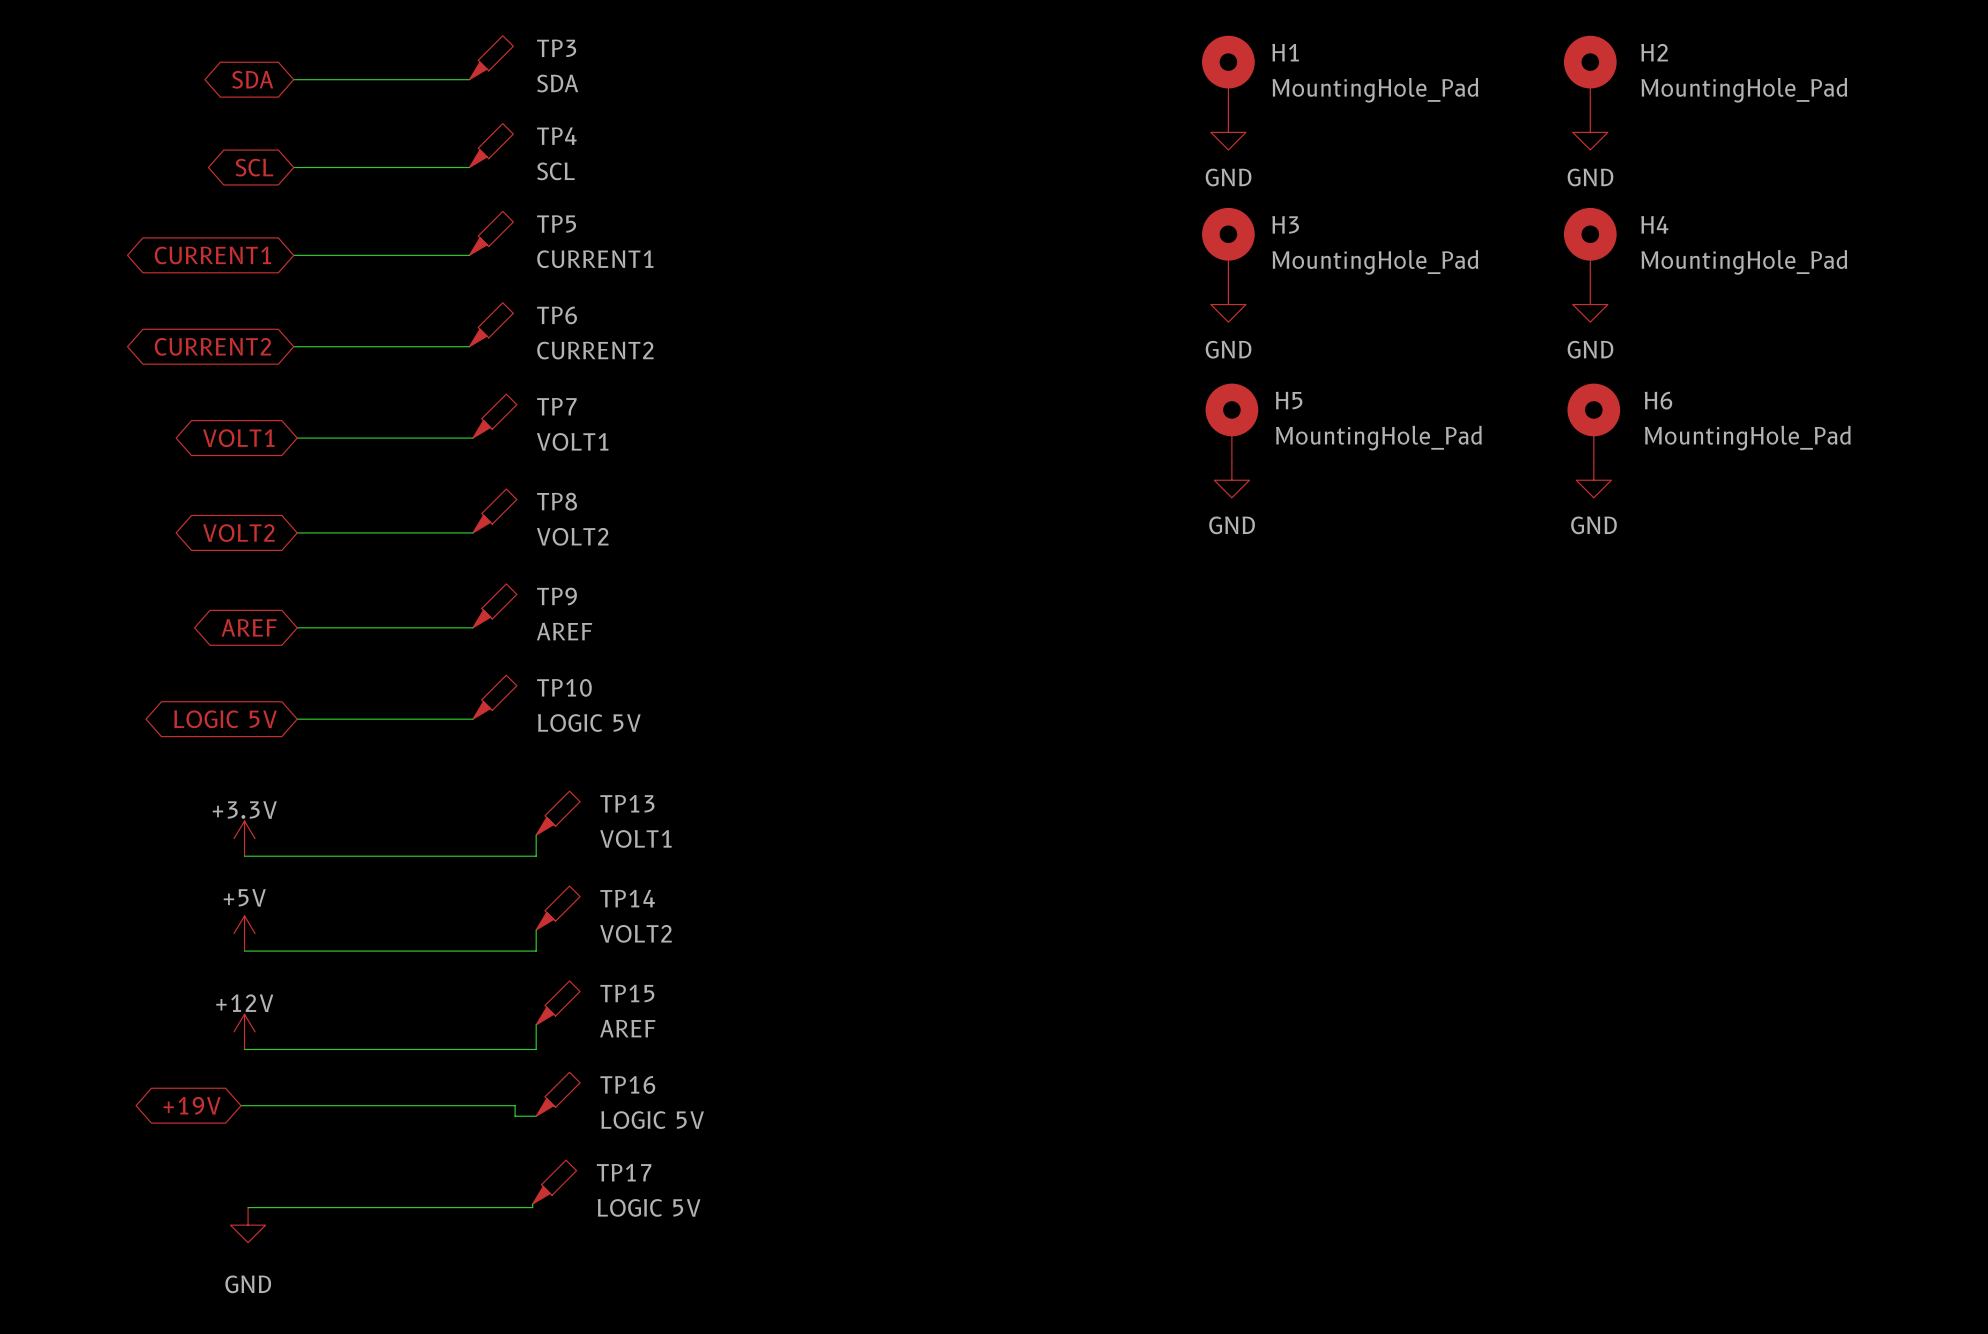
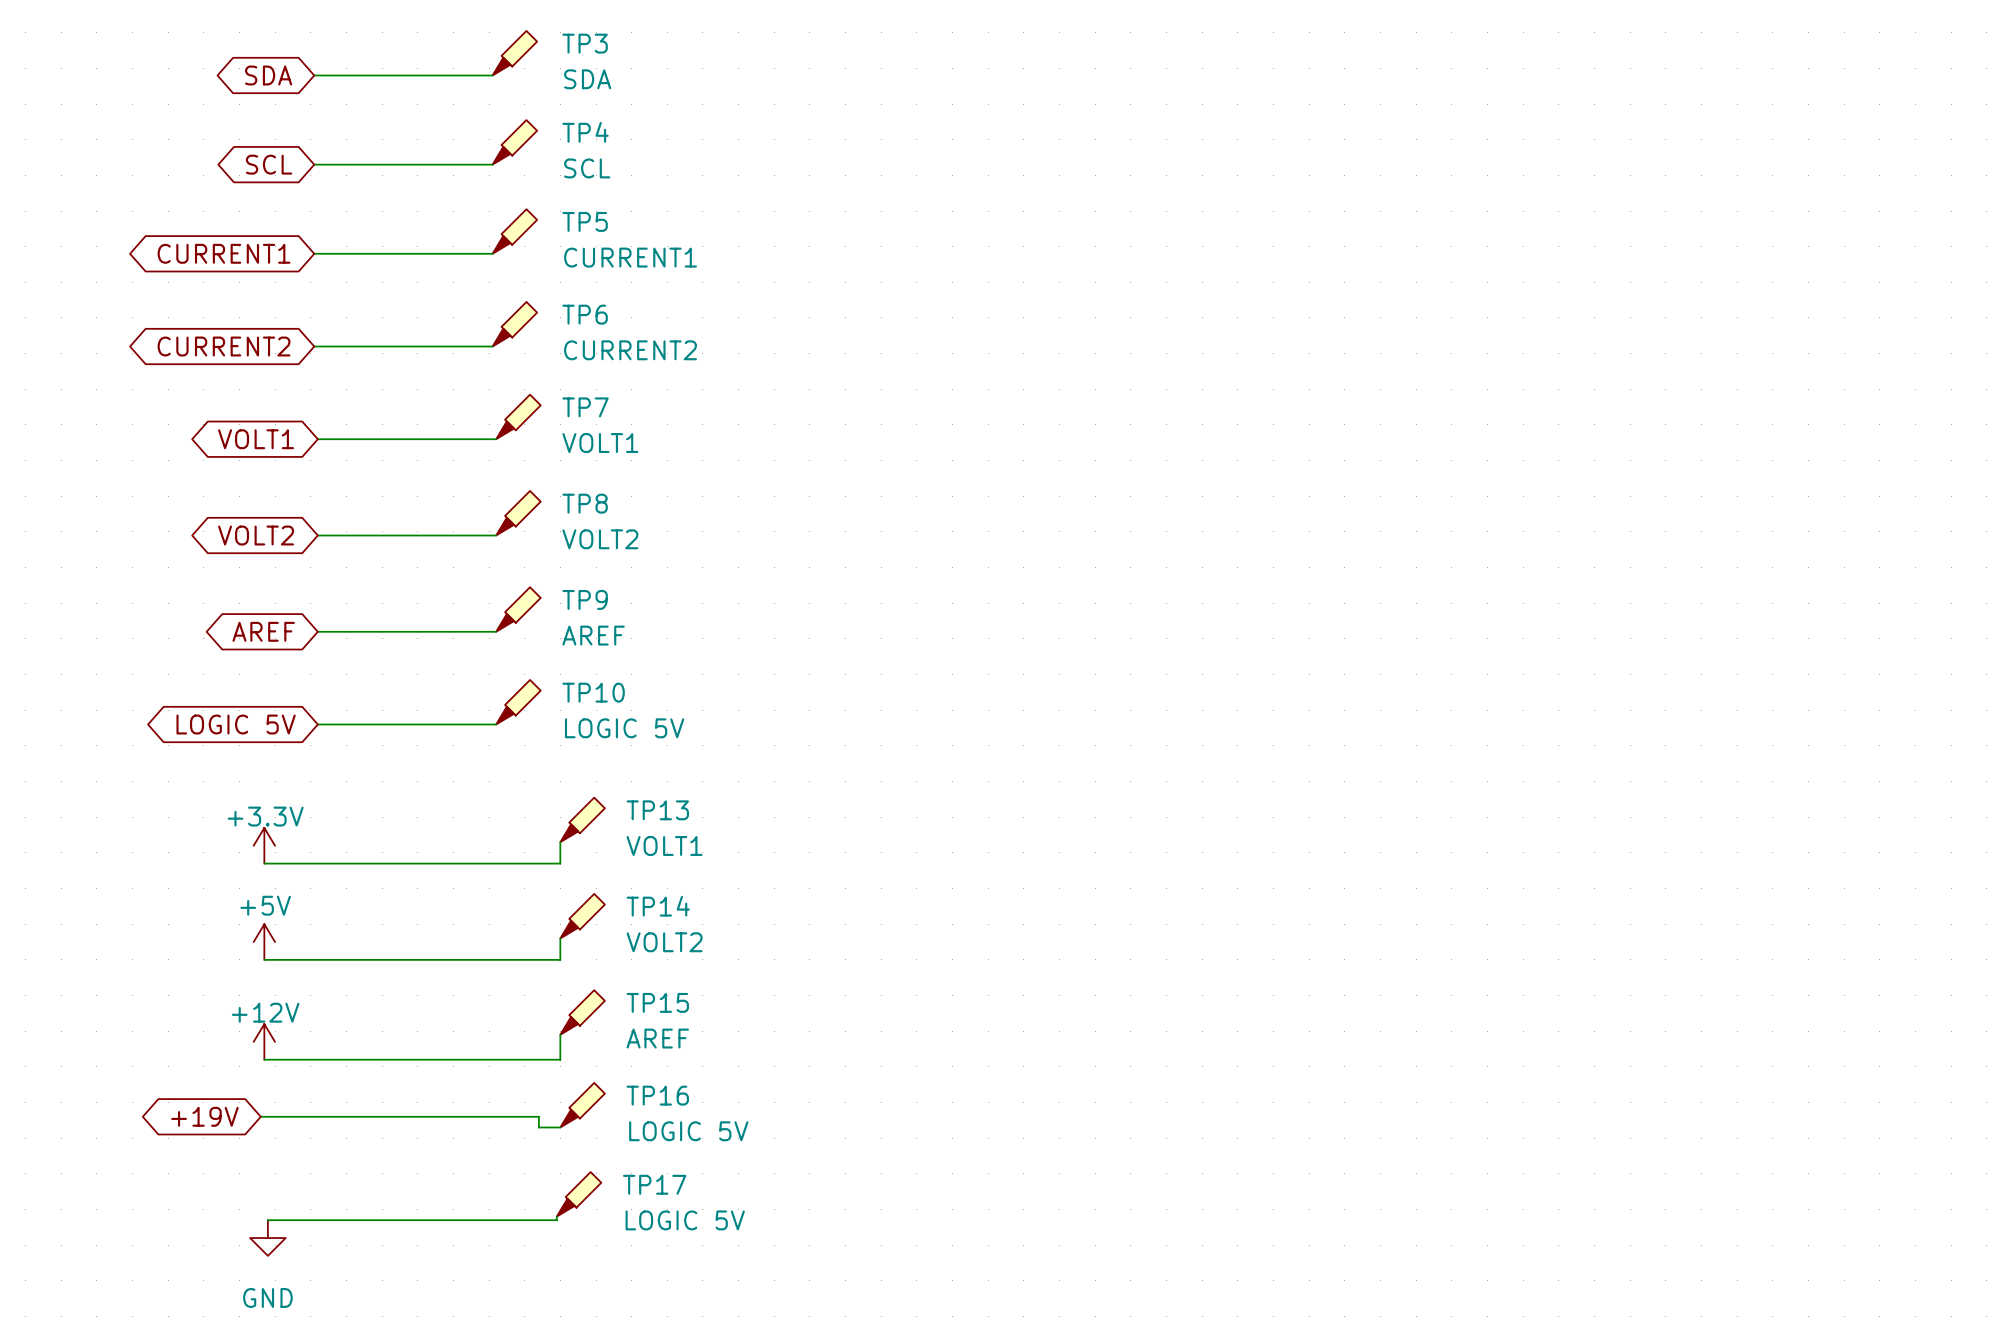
H1: MountingHole_Pad (1228, 75) -> none
H2: MountingHole_Pad (1590, 75) -> none
power symbol: GND (1228, 132) -> none
power symbol: GND (1590, 132) -> none
H3: MountingHole_Pad (1228, 247) -> none
H4: MountingHole_Pad (1590, 247) -> none
power symbol: GND (1228, 304) -> none
power symbol: GND (1590, 304) -> none
H5: MountingHole_Pad (1231, 423) -> none
H6: MountingHole_Pad (1593, 423) -> none
power symbol: GND (1231, 480) -> none
power symbol: GND (1593, 480) -> none

